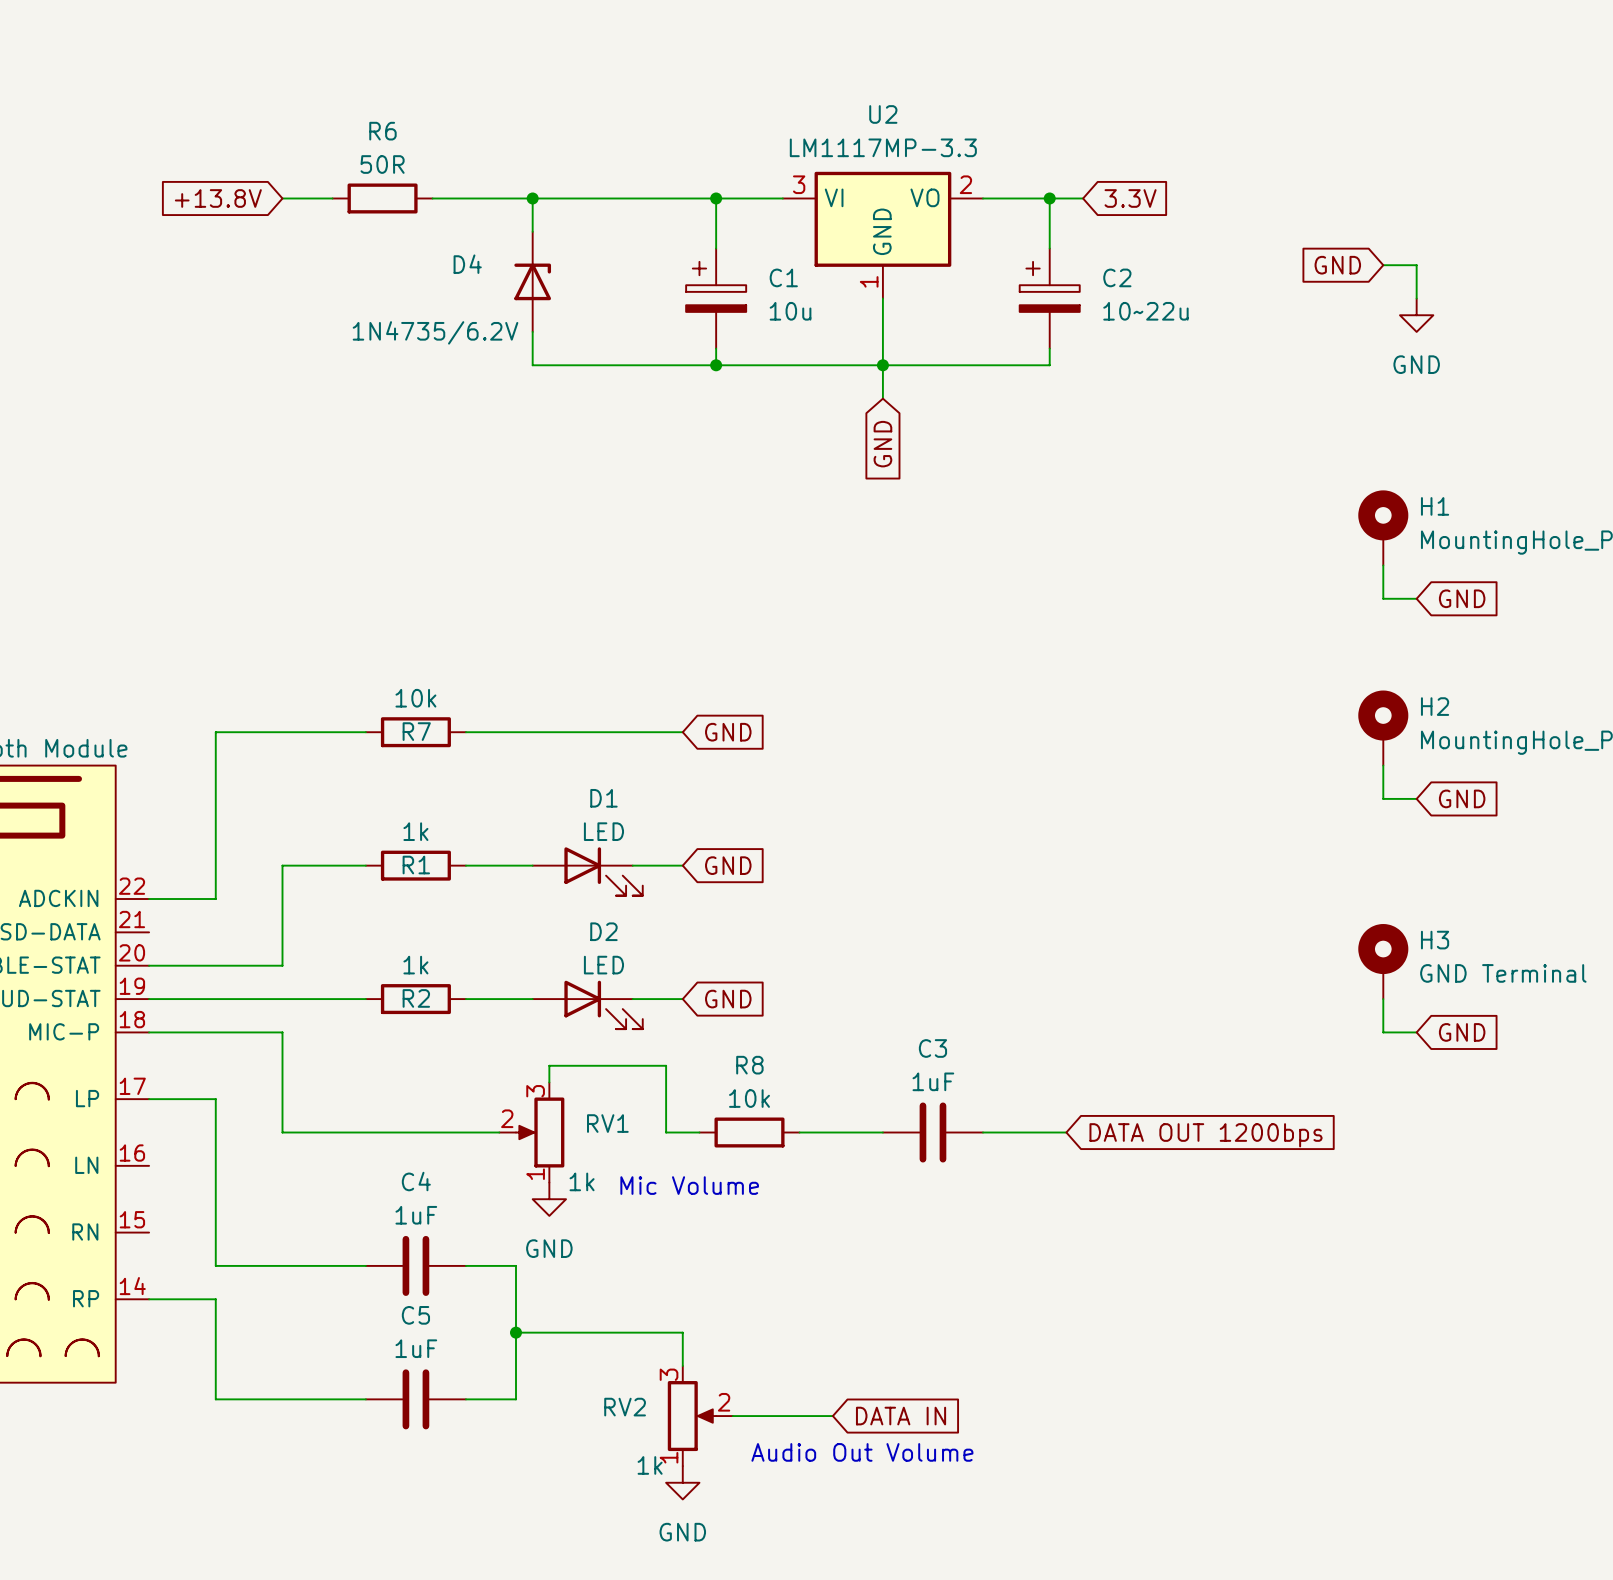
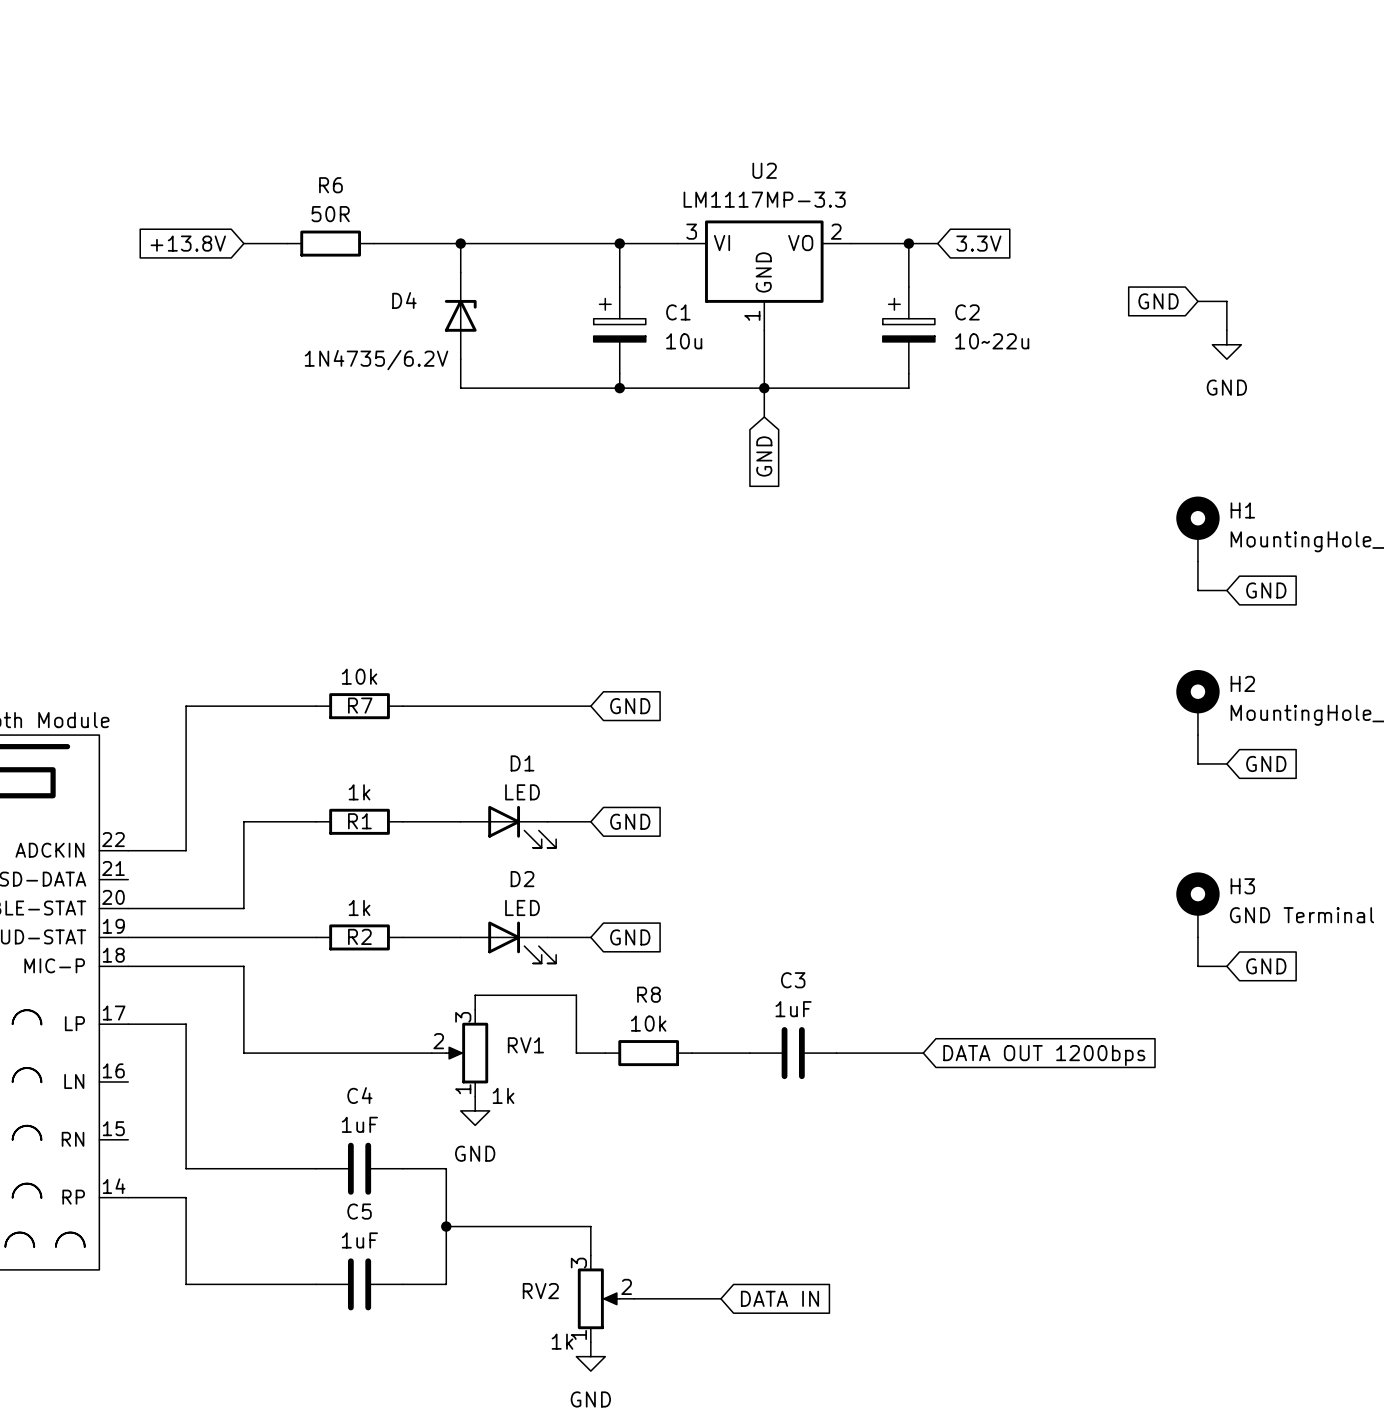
C3 position: (932, 1132) -> (793, 1053)
text: Mic Volume (689, 1185) -> none
text: Audio Out Volume (862, 1452) -> none

